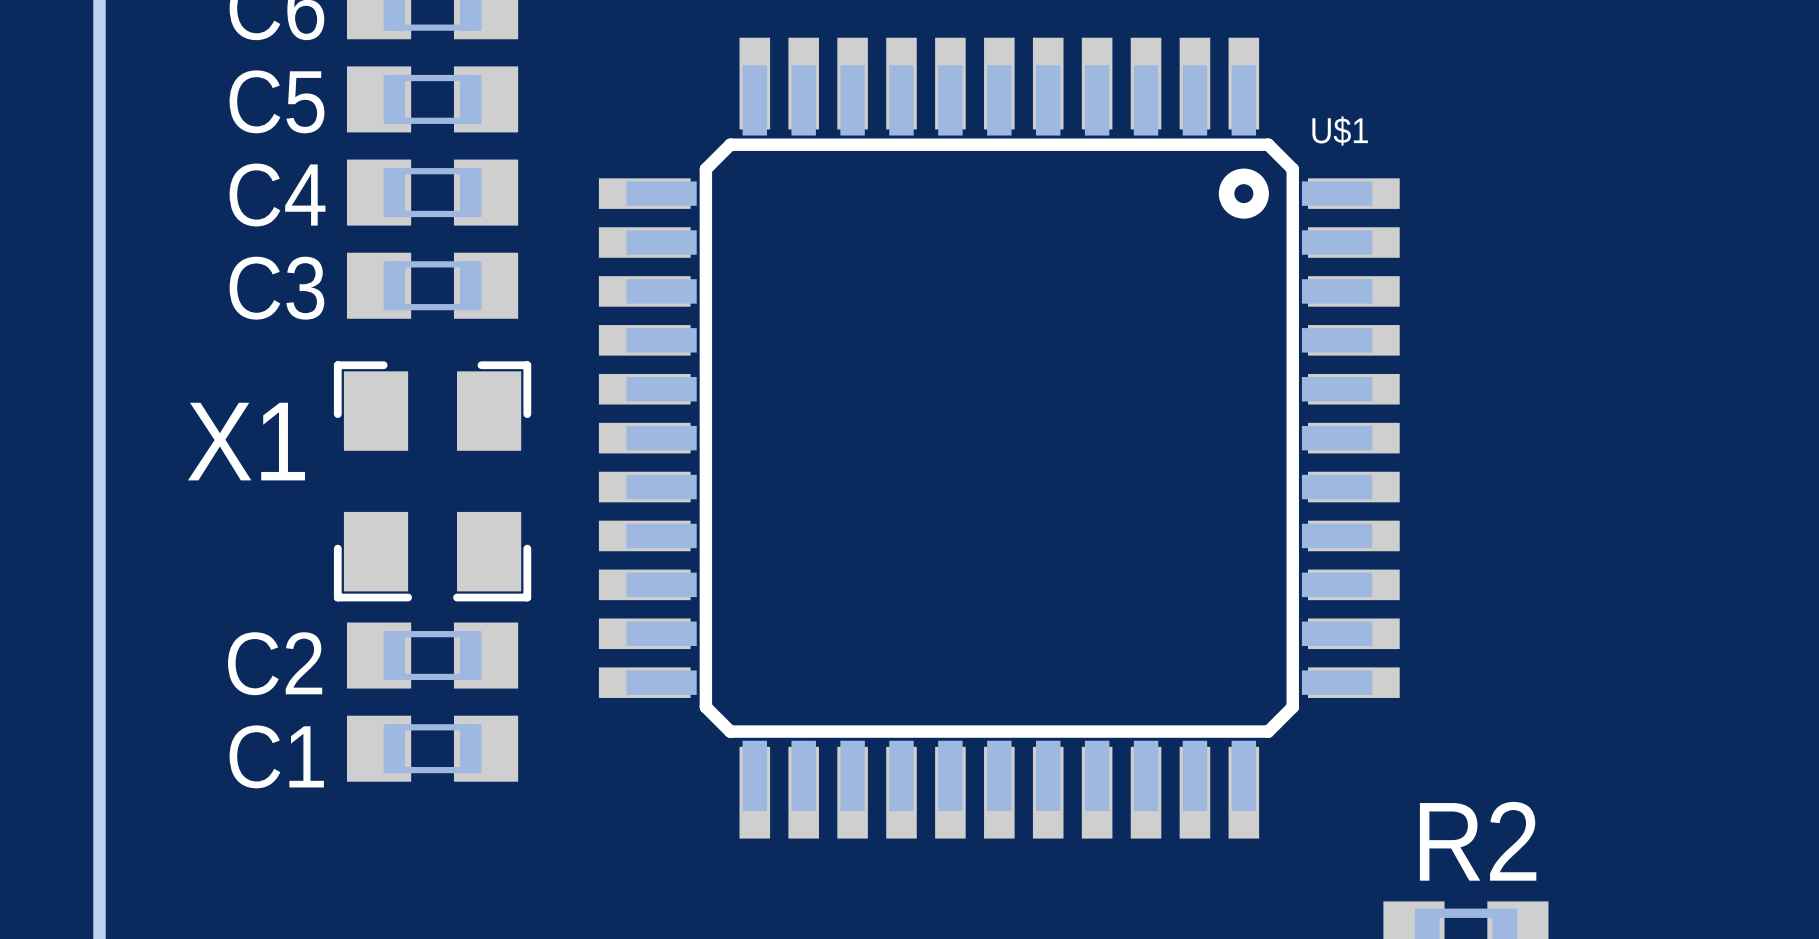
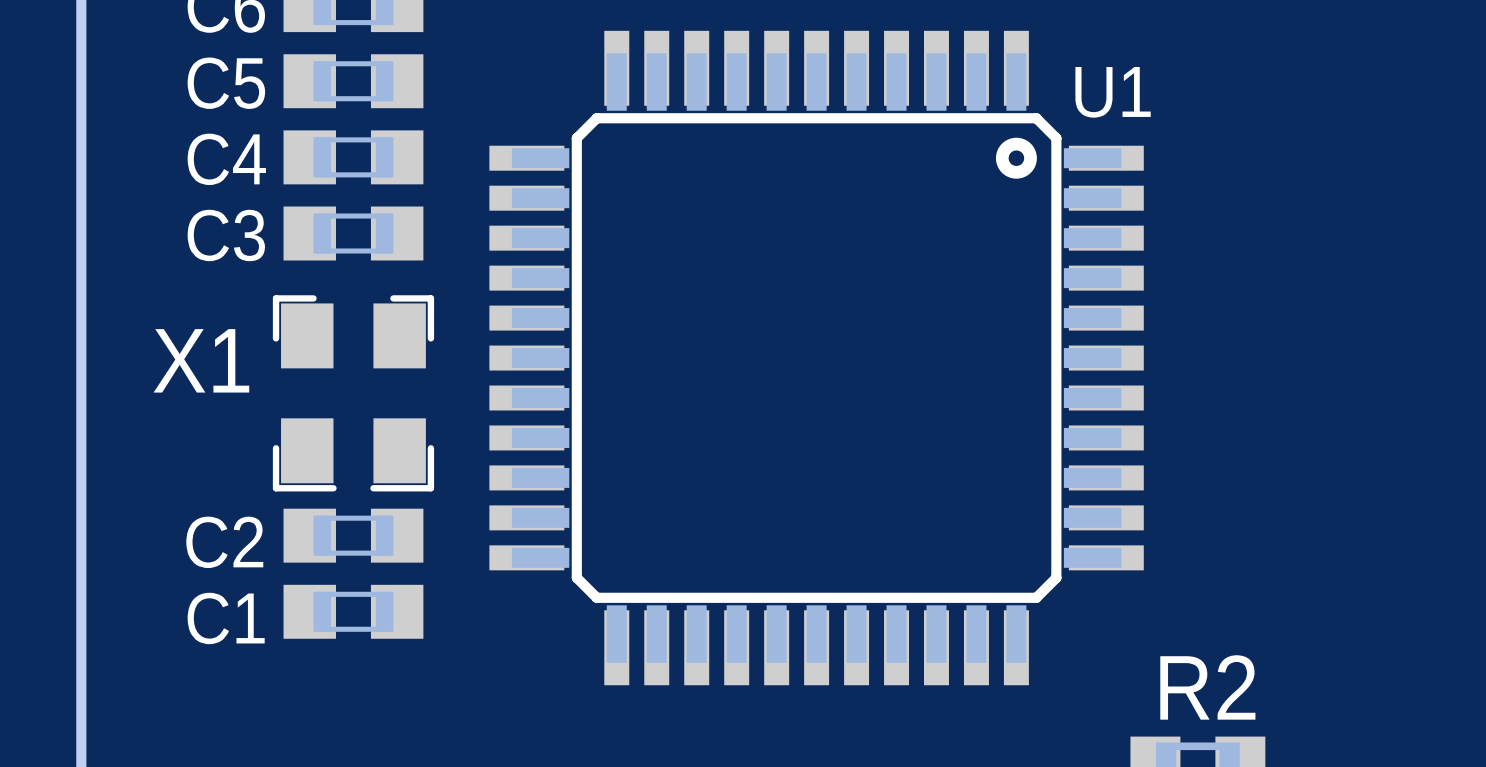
U$1 name: U$1 (1340, 131) -> U1 (1113, 92)

